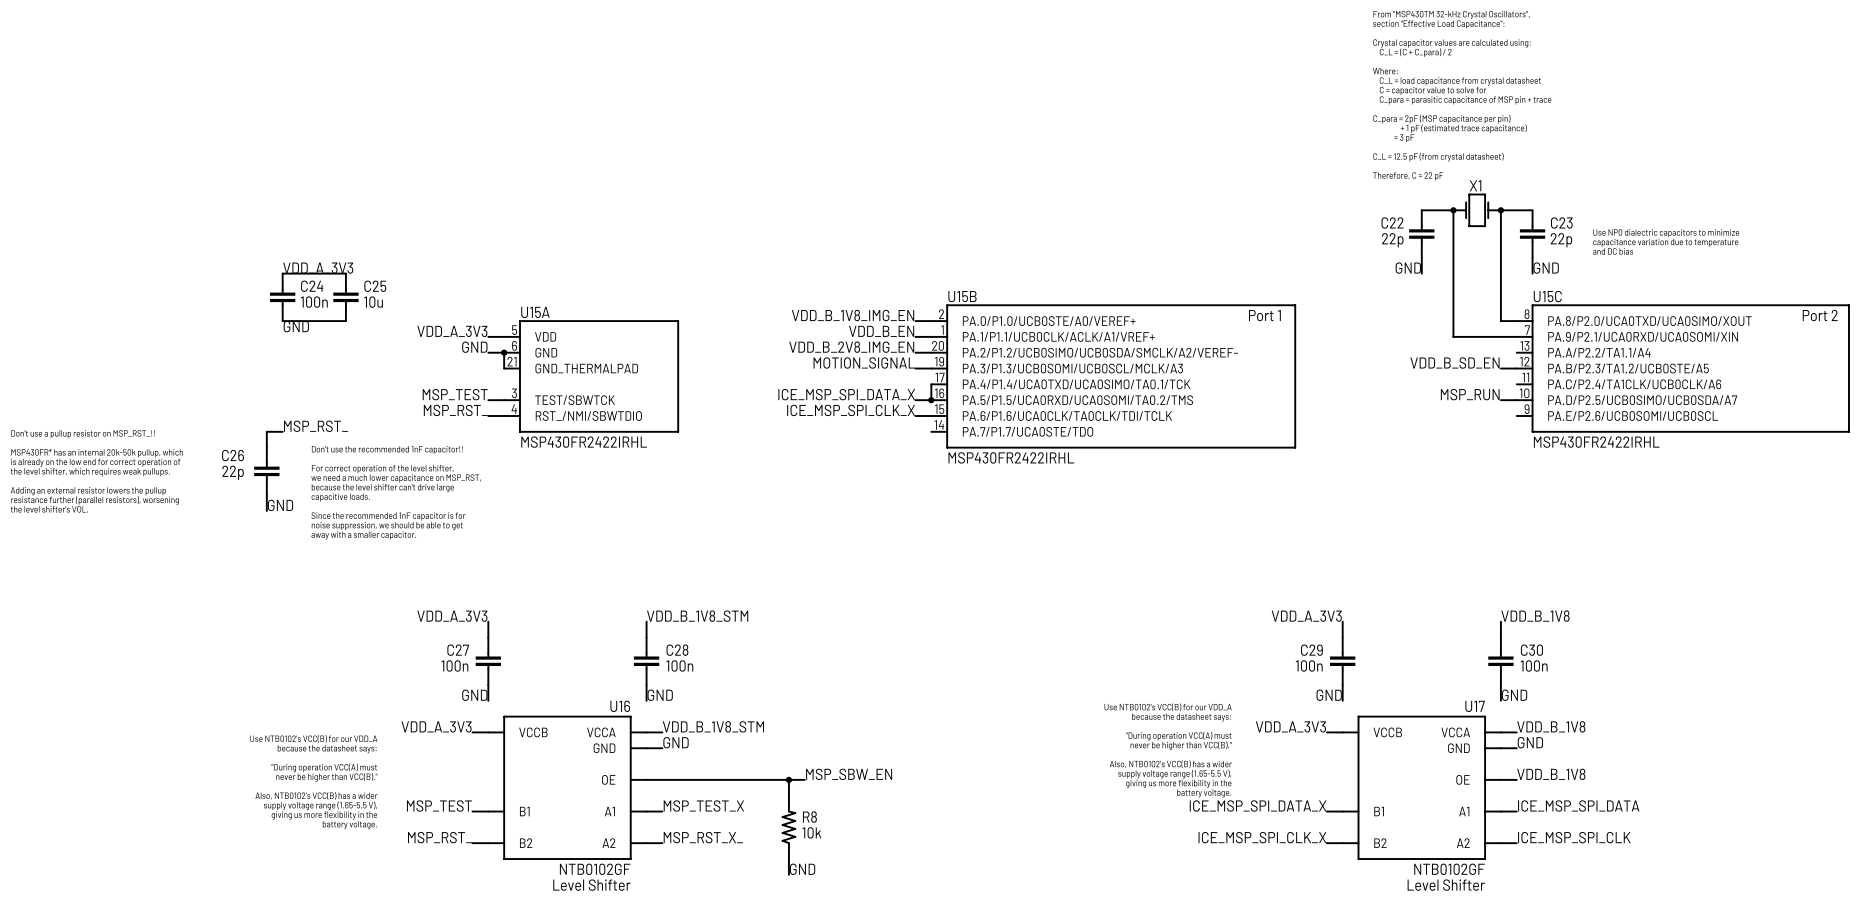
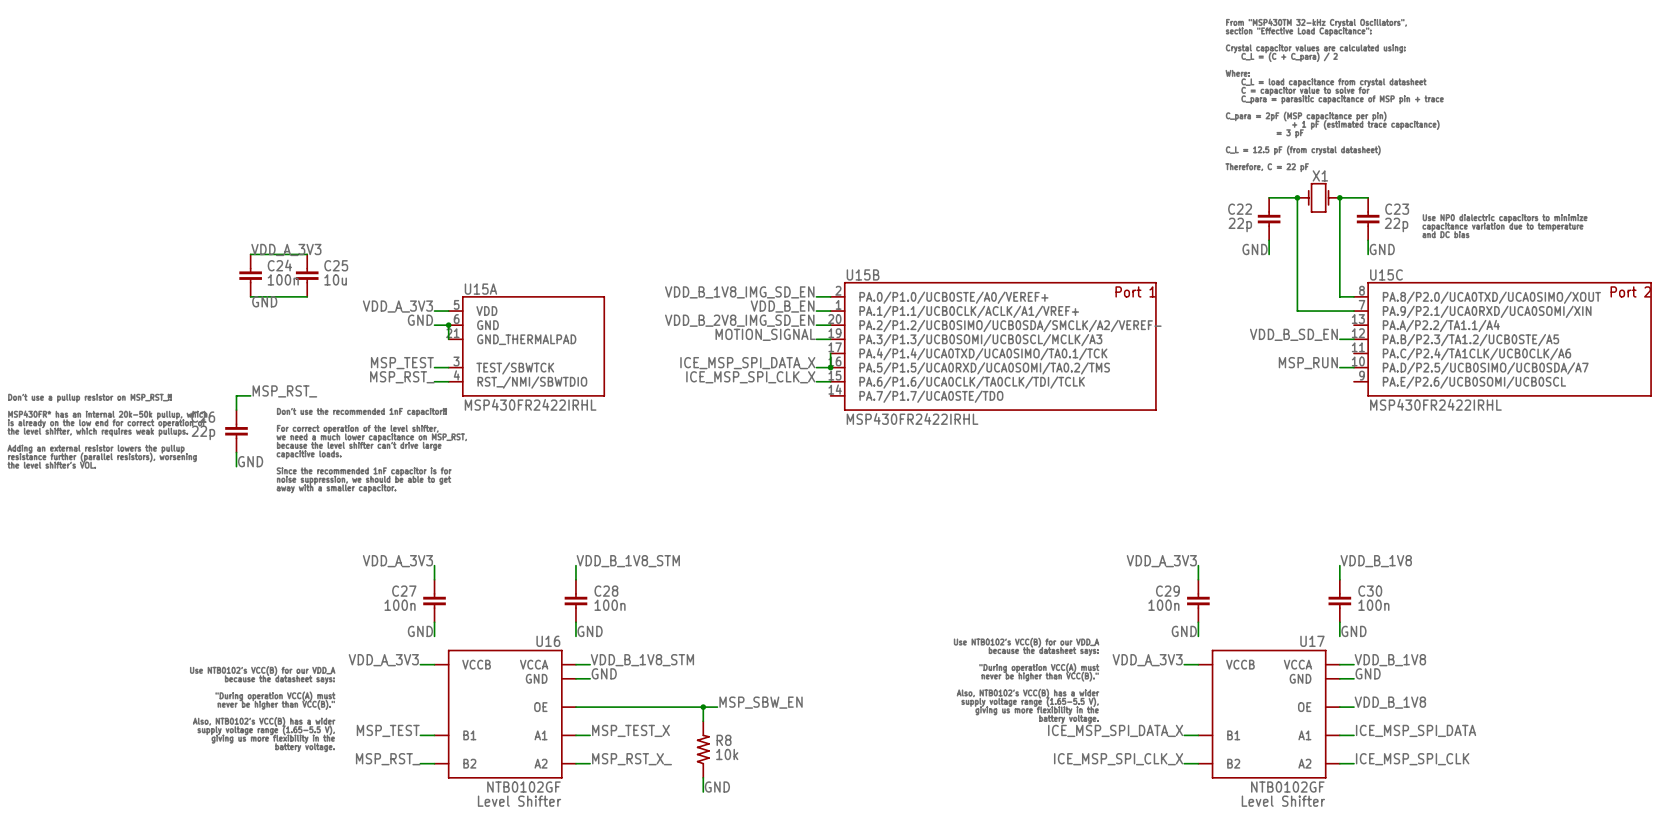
label: VDD_B_1V8_IMG_EN (853, 315) -> VDD_B_1V8_IMG_SD_EN (739, 292)
label: VDD_B_2V8_IMG_EN (851, 347) -> VDD_B_2V8_IMG_SD_EN (739, 320)

